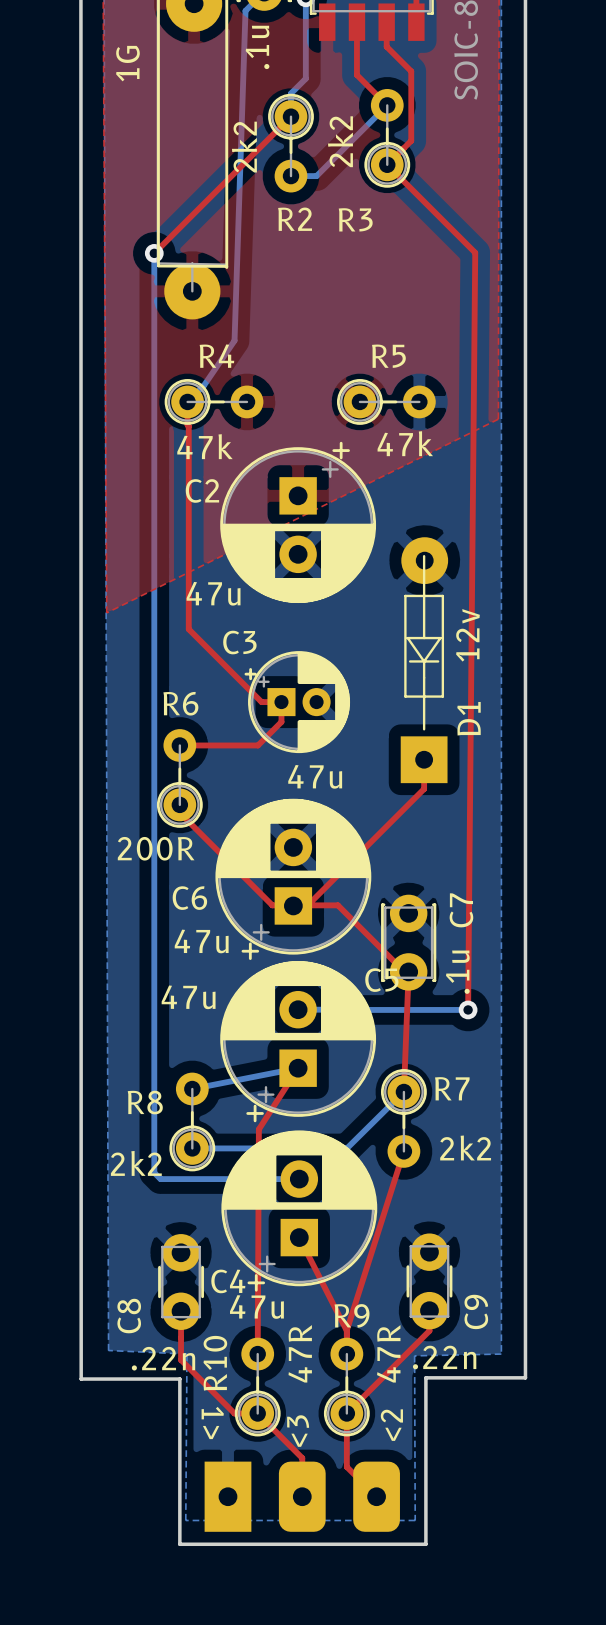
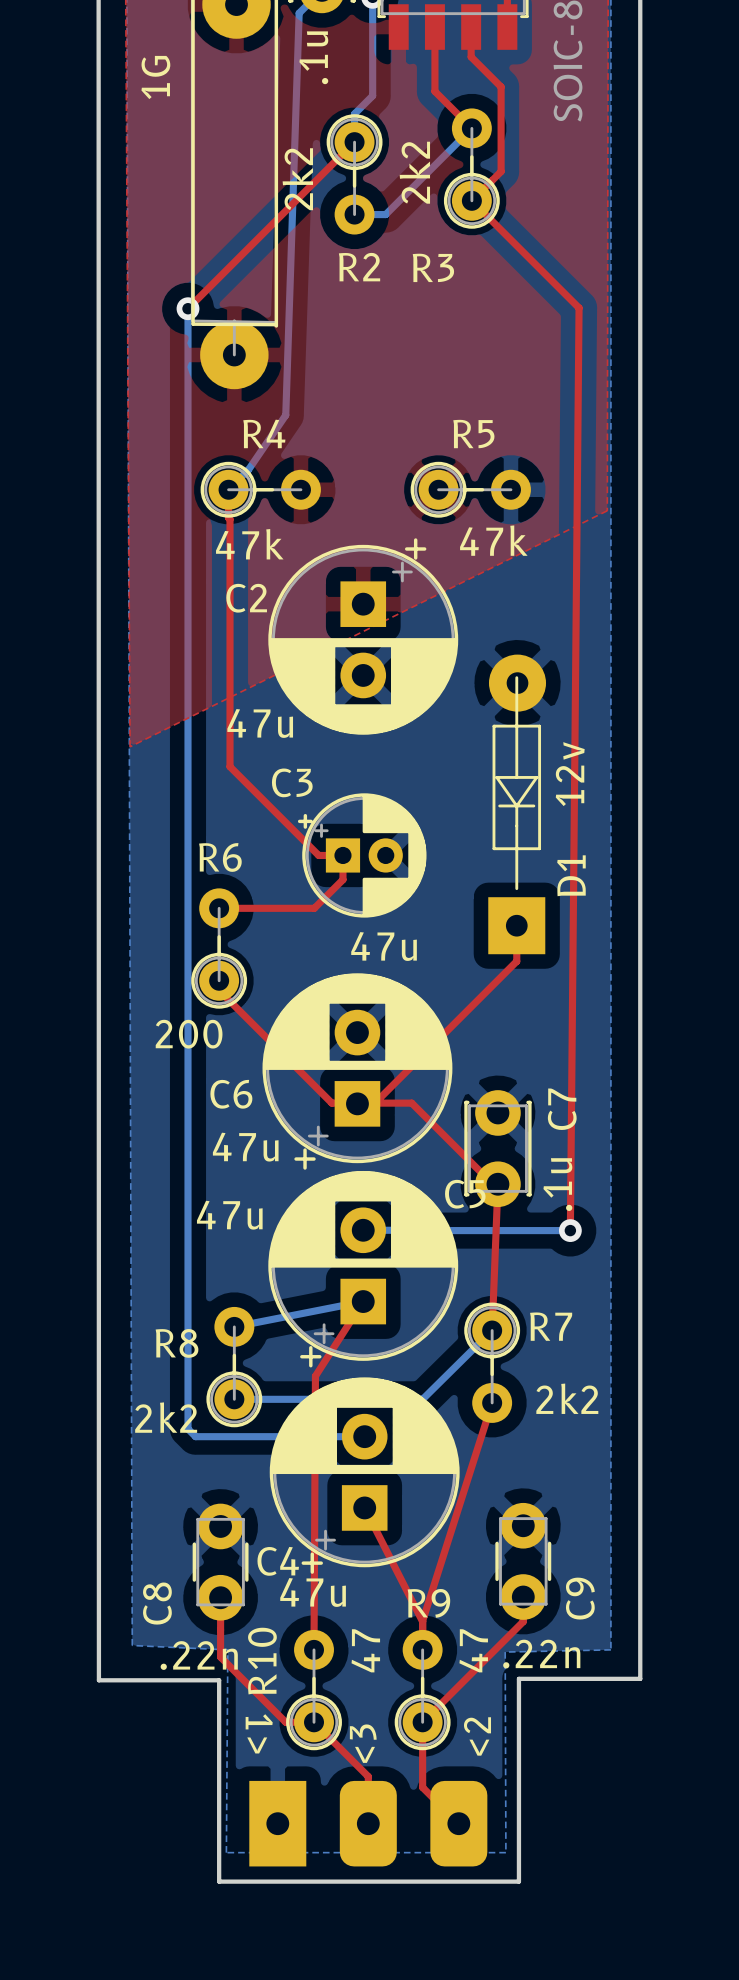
R6 value: 200R (156, 848) -> 200 (189, 1034)
R10 value: 47R (300, 1353) -> 47 (365, 1650)
R9 value: 47R (388, 1353) -> 47 (473, 1650)

